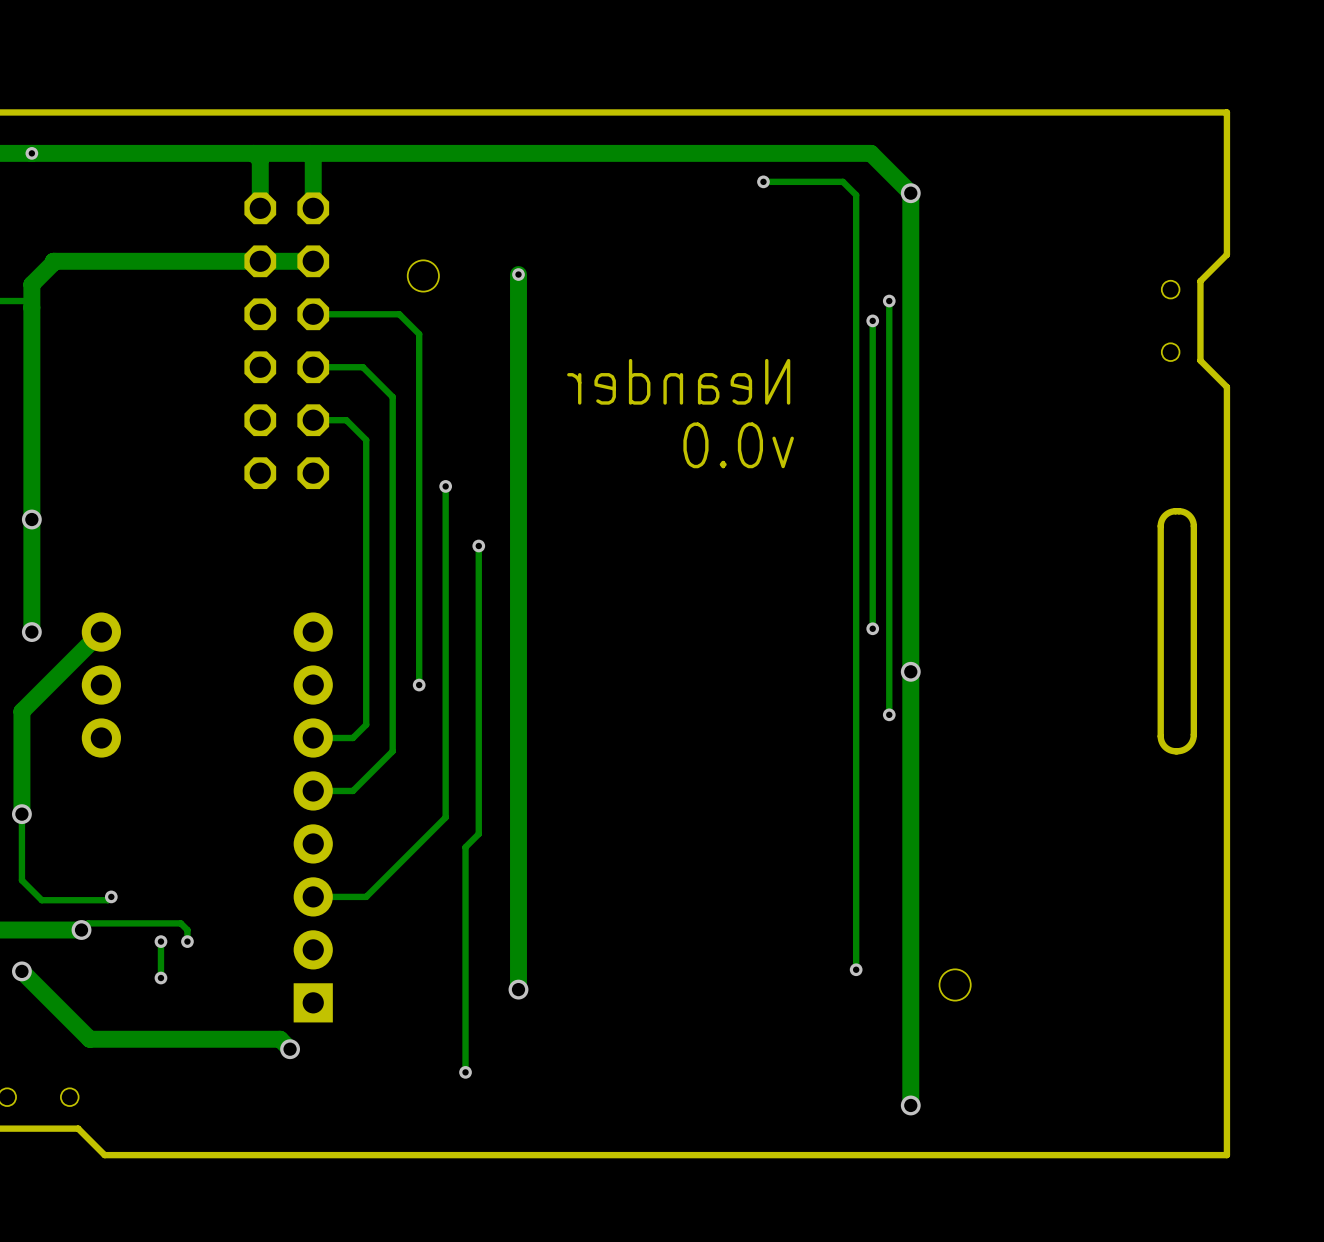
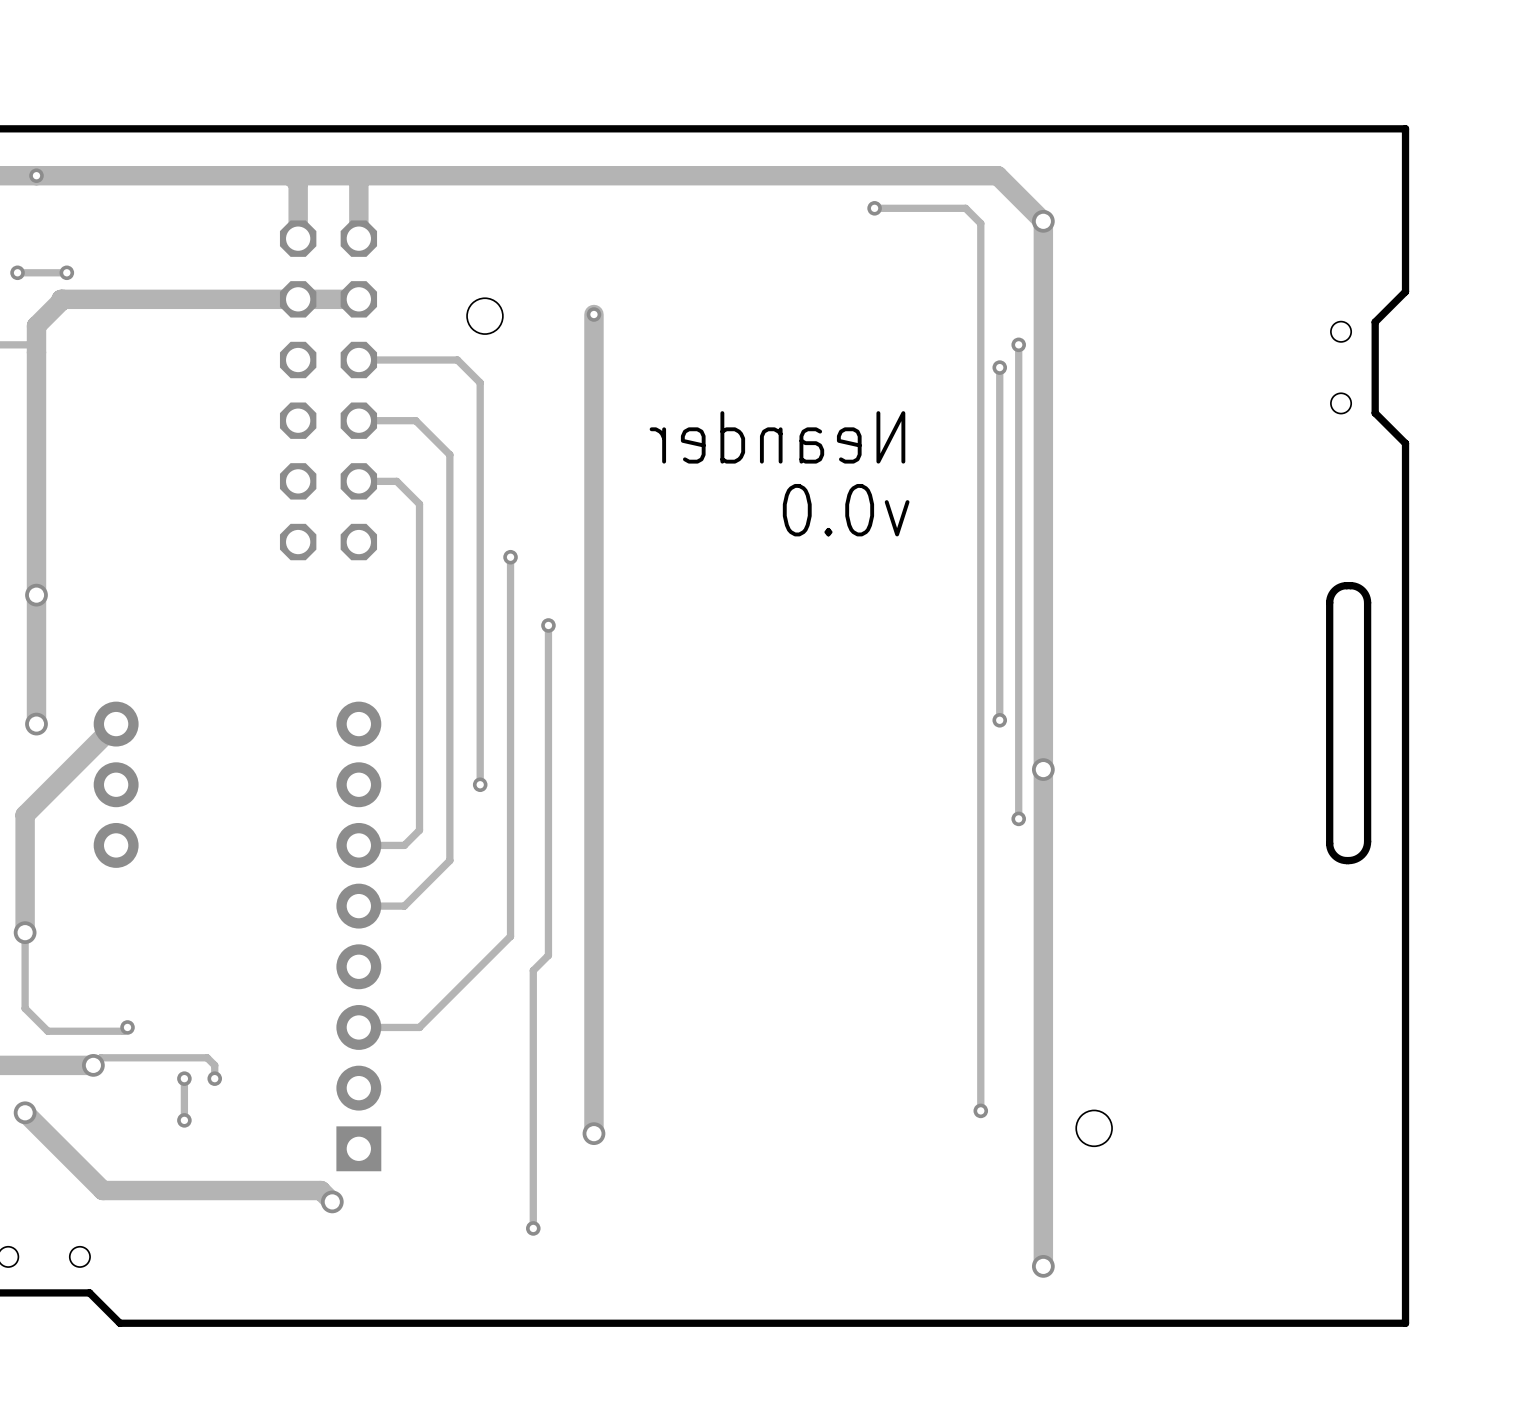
via: none -> (17, 272)
track: none -> (66, 272) (17, 272)
via: none -> (66, 272)

